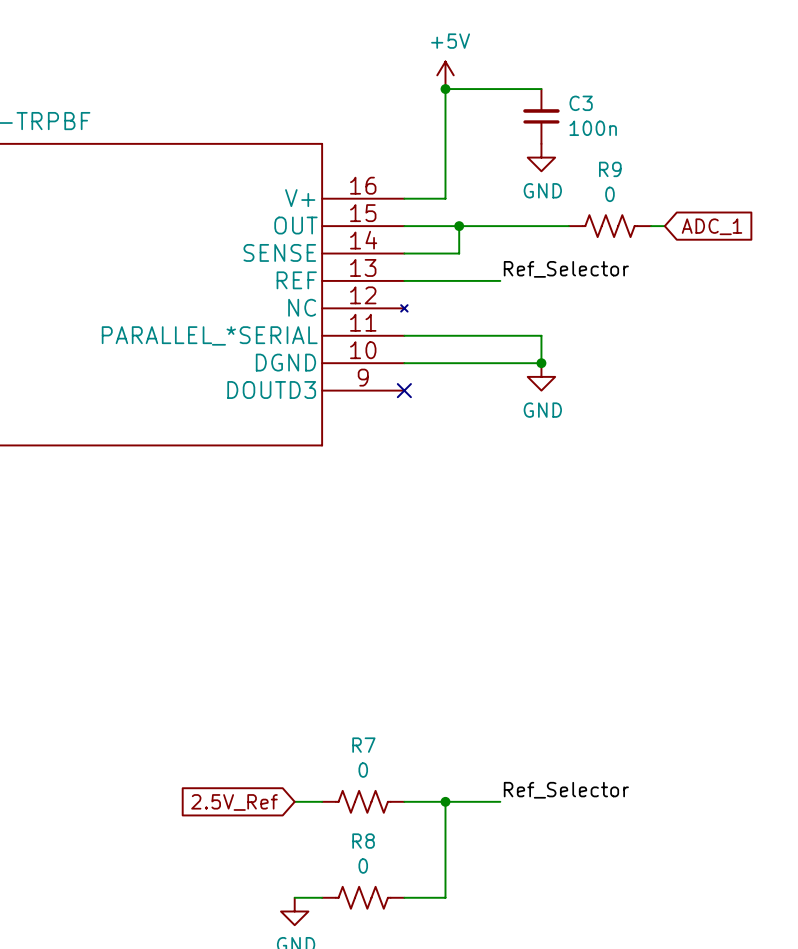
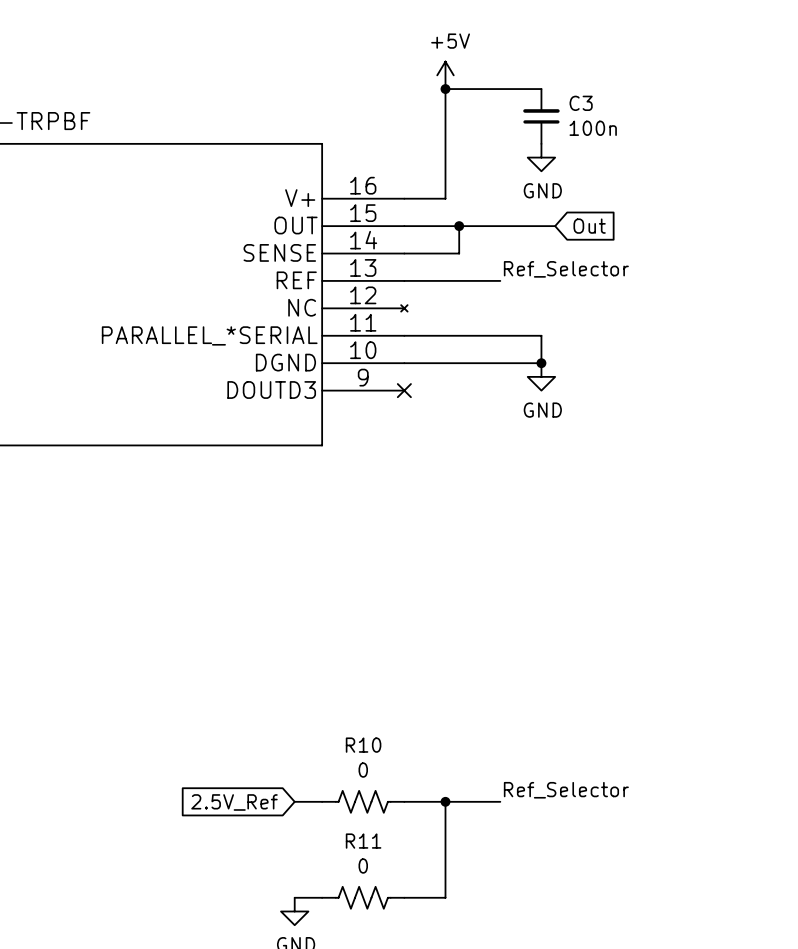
wire: (555, 226) (568, 226) -> none
global label: none -> Out (589, 226)
R9: 0 (609, 226) -> none
wire: (651, 226) (664, 226) -> none
global label: ADC_1 (711, 226) -> none
R7 name: R7 (363, 745) -> R10 (363, 745)
R8 name: R8 (363, 841) -> R11 (363, 841)

